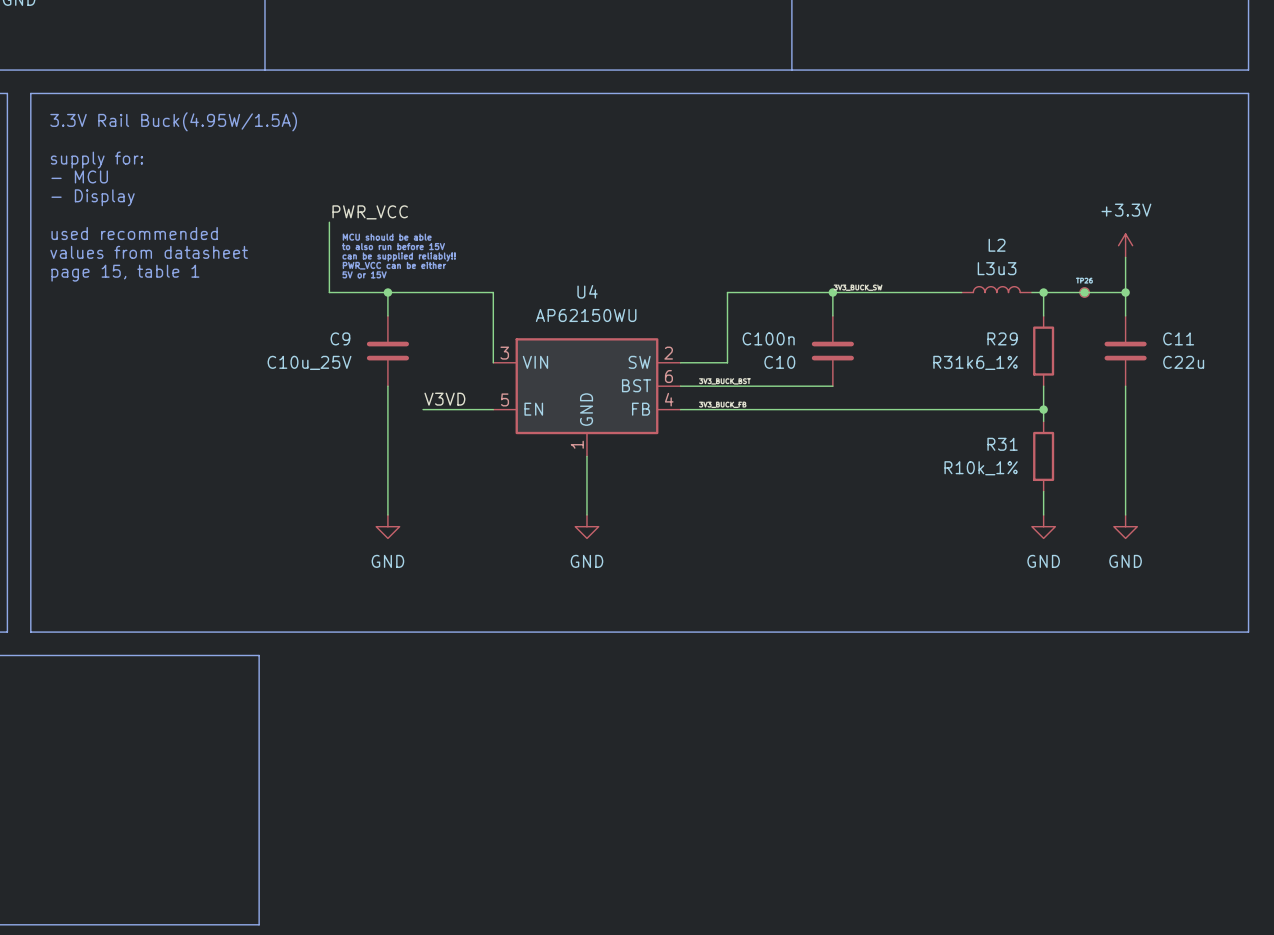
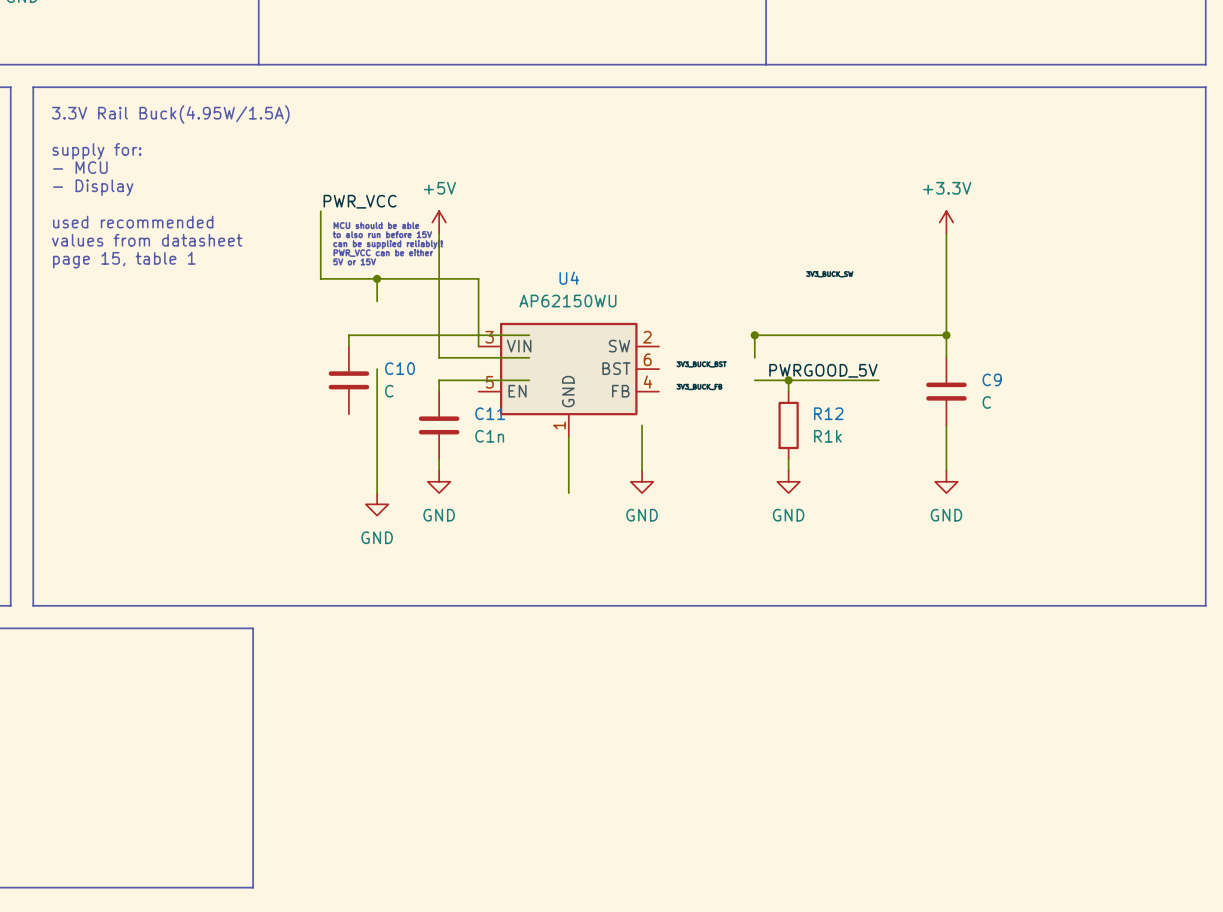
power symbol: none -> +5V (439, 222)
wire: none -> (439, 233) (439, 357) (529, 357)
power symbol position: +3.3V (1125, 245) -> +3.3V (946, 222)
wire: (1125, 257) (1125, 315) -> none
L2: L3u3 (996, 289) -> none
wire: (832, 292) (832, 315) -> none
junction: (832, 292) -> none
wire: (961, 292) (727, 292) (727, 362) (680, 362) -> none
wire: (1031, 292) (1125, 292) -> none
wire: (1043, 292) (1043, 315) -> none
junction: (1043, 292) -> none
junction: (1084, 292) -> none
part: (1084, 292) -> none
junction: (1125, 292) -> none
C9 name position: C9 (340, 338) -> C9 (992, 379)
C10 value: C100n (768, 338) -> C (389, 391)
C9 position: (387, 351) -> (946, 391)
wire: none -> (529, 335) (348, 335) (348, 346)
junction: none -> (754, 335)
C10 position: (832, 351) -> (348, 380)
wire: none -> (946, 335) (754, 335) (754, 357)
junction: none -> (946, 335)
R29: R31k6_1% (1043, 351) -> none
C11 position: (1125, 351) -> (439, 425)
C9 value: C10u_25V (309, 362) -> C (986, 402)
C10 name position: C10 (779, 362) -> C10 (400, 368)
C11 value: C22u (1183, 362) -> C1n (489, 436)
wire: (680, 386) (832, 386) -> none
wire: (1043, 386) (1043, 421) -> none
wire: (1125, 386) (1125, 514) -> (946, 233) (946, 357)
label: none -> PWRGOOD_5V (823, 370)
wire: none -> (529, 380) (439, 380) (439, 391)
wire: none -> (754, 380) (878, 380)
wire: none -> (788, 380) (788, 391)
junction: none -> (788, 380)
label: V3VD (444, 399) -> none
wire: (423, 409) (493, 409) -> none
wire: (680, 409) (1043, 409) -> none
junction: (1043, 409) -> none
wire: none -> (642, 425) (642, 470)
R12: none -> R1k (788, 425)
wire: none -> (946, 425) (946, 470)
R31: R10k_1% (1043, 456) -> none
wire: none -> (439, 459) (439, 470)
wire: none -> (788, 459) (788, 470)
wire: (1043, 491) (1043, 514) -> none
power symbol: none -> GND (439, 481)
power symbol: none -> GND (642, 481)
power symbol: none -> GND (788, 481)
power symbol: GND (586, 526) -> none
power symbol position: GND (1043, 526) -> GND (946, 481)
power symbol: GND (1125, 526) -> none

